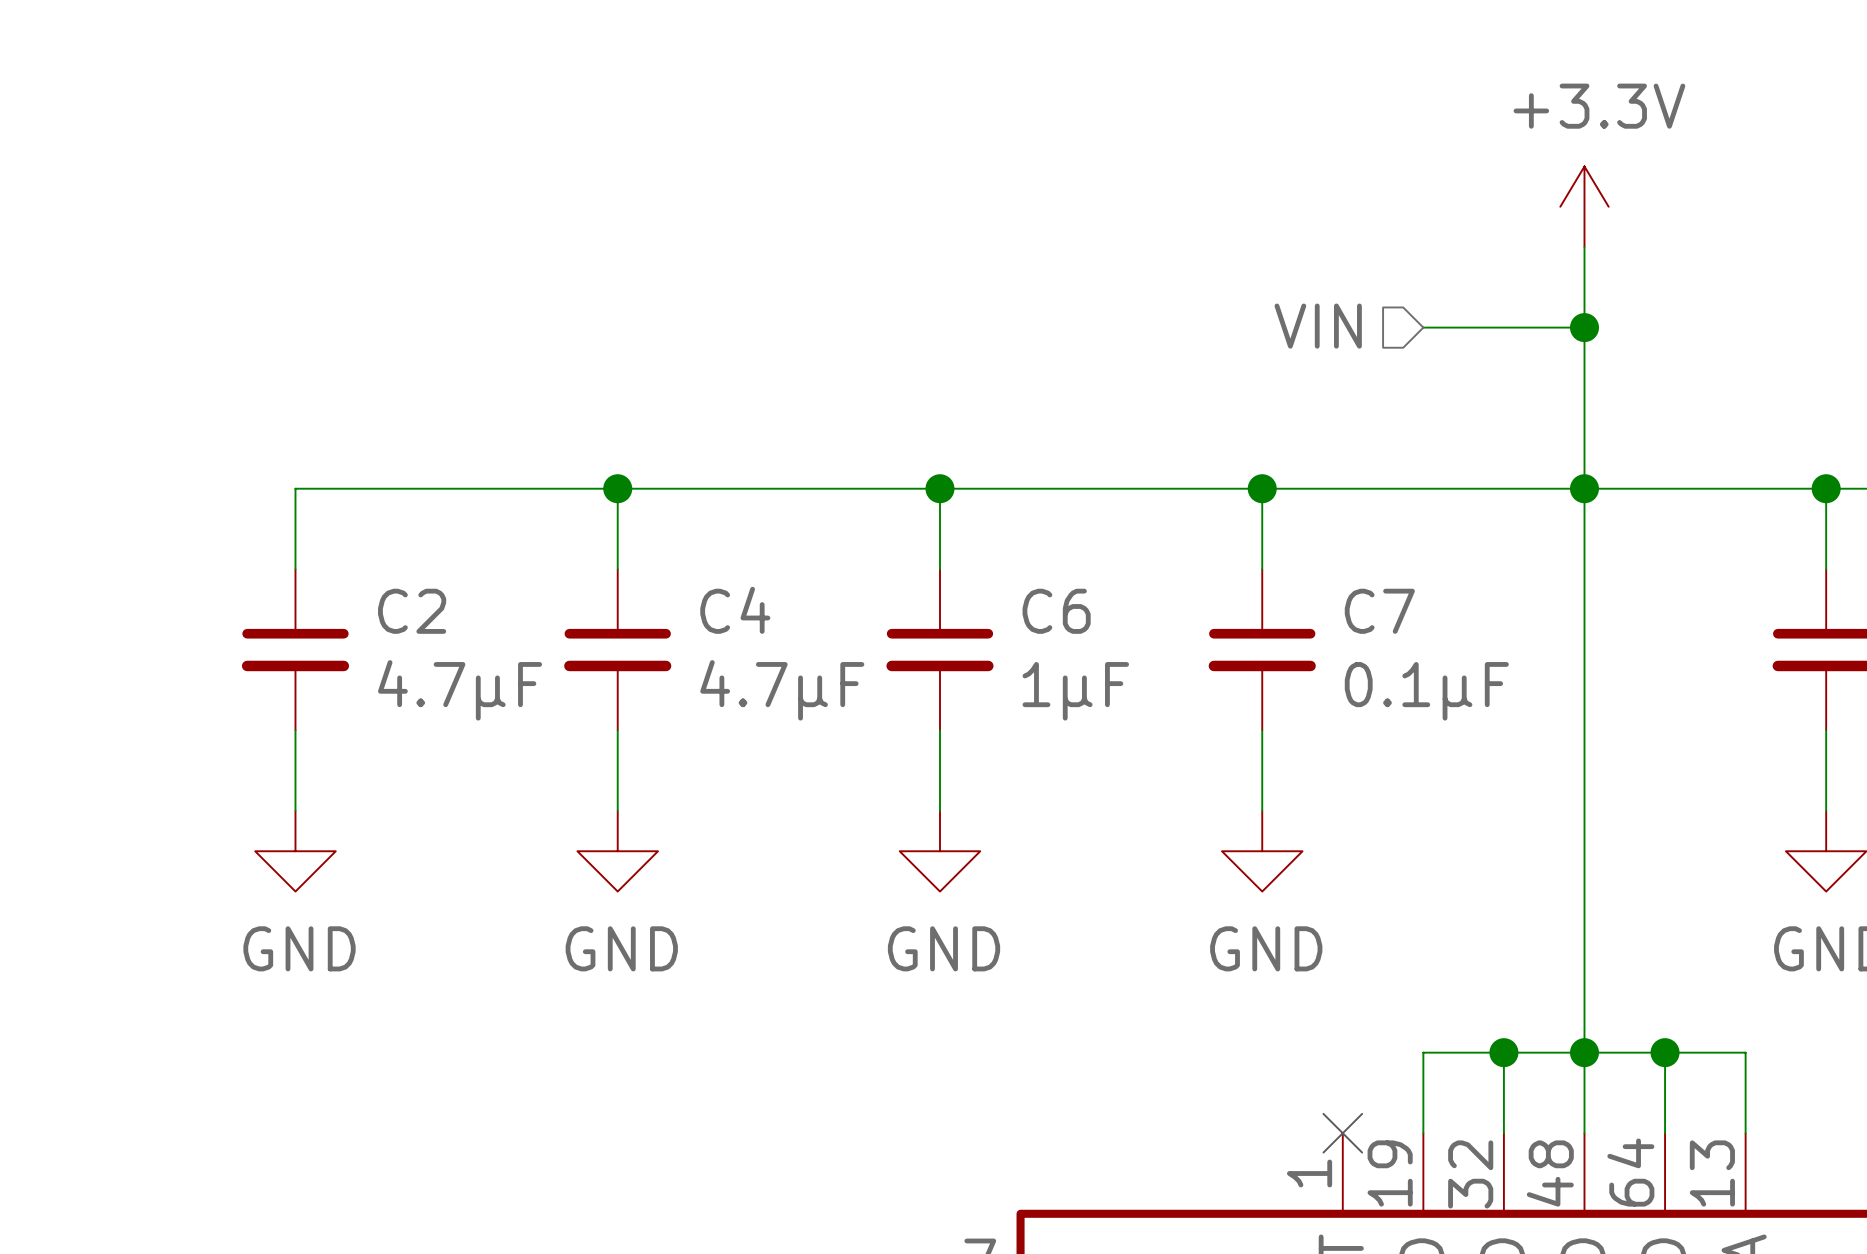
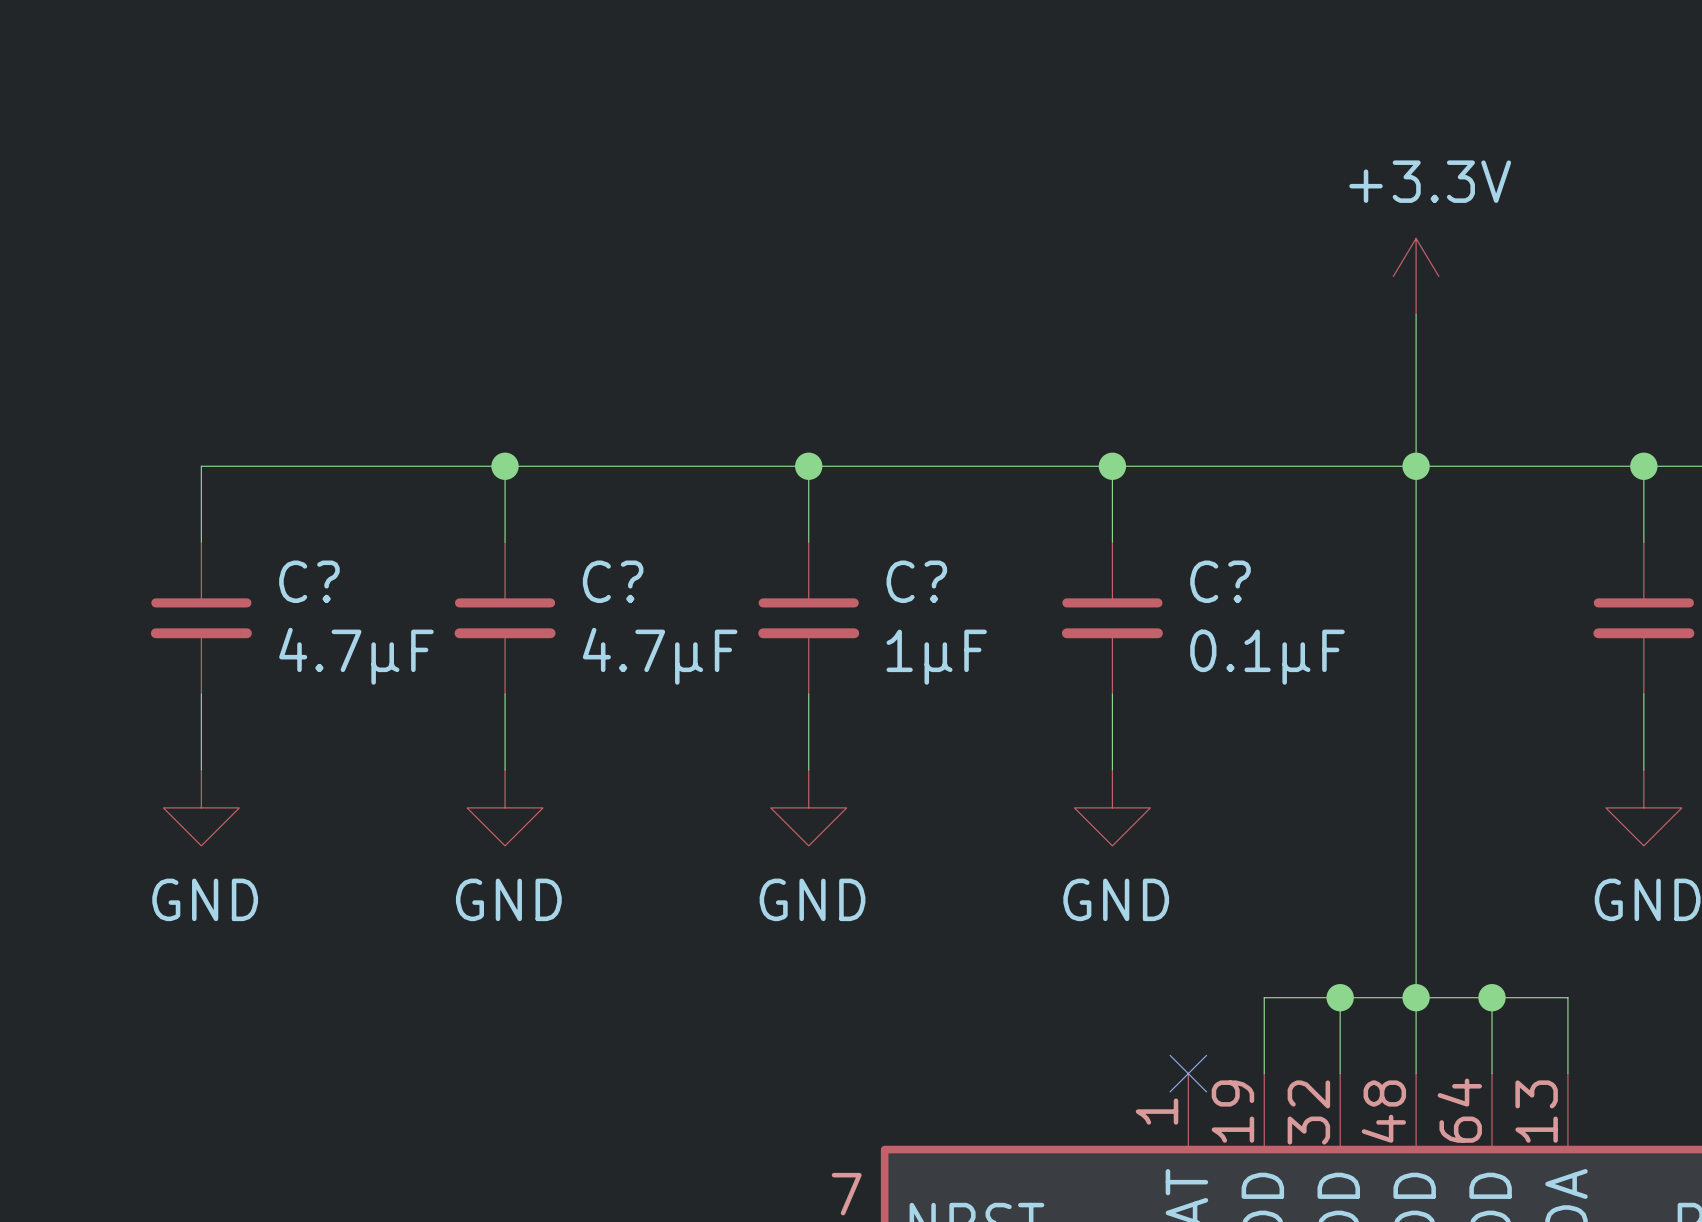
power symbol position: +3.3V (1584, 206) -> +3.3V (1416, 276)
wire: (1584, 247) (1584, 327) (1423, 327) -> none
hierarchical label: VIN (1318, 326) -> none
junction: (1584, 327) -> none
C4 name: C4 (735, 610) -> C? (613, 581)
C2 name: C2 (412, 611) -> C? (309, 581)
C6 name: C6 (1056, 611) -> C? (916, 581)
C7 name: C7 (1379, 611) -> C? (1220, 581)

